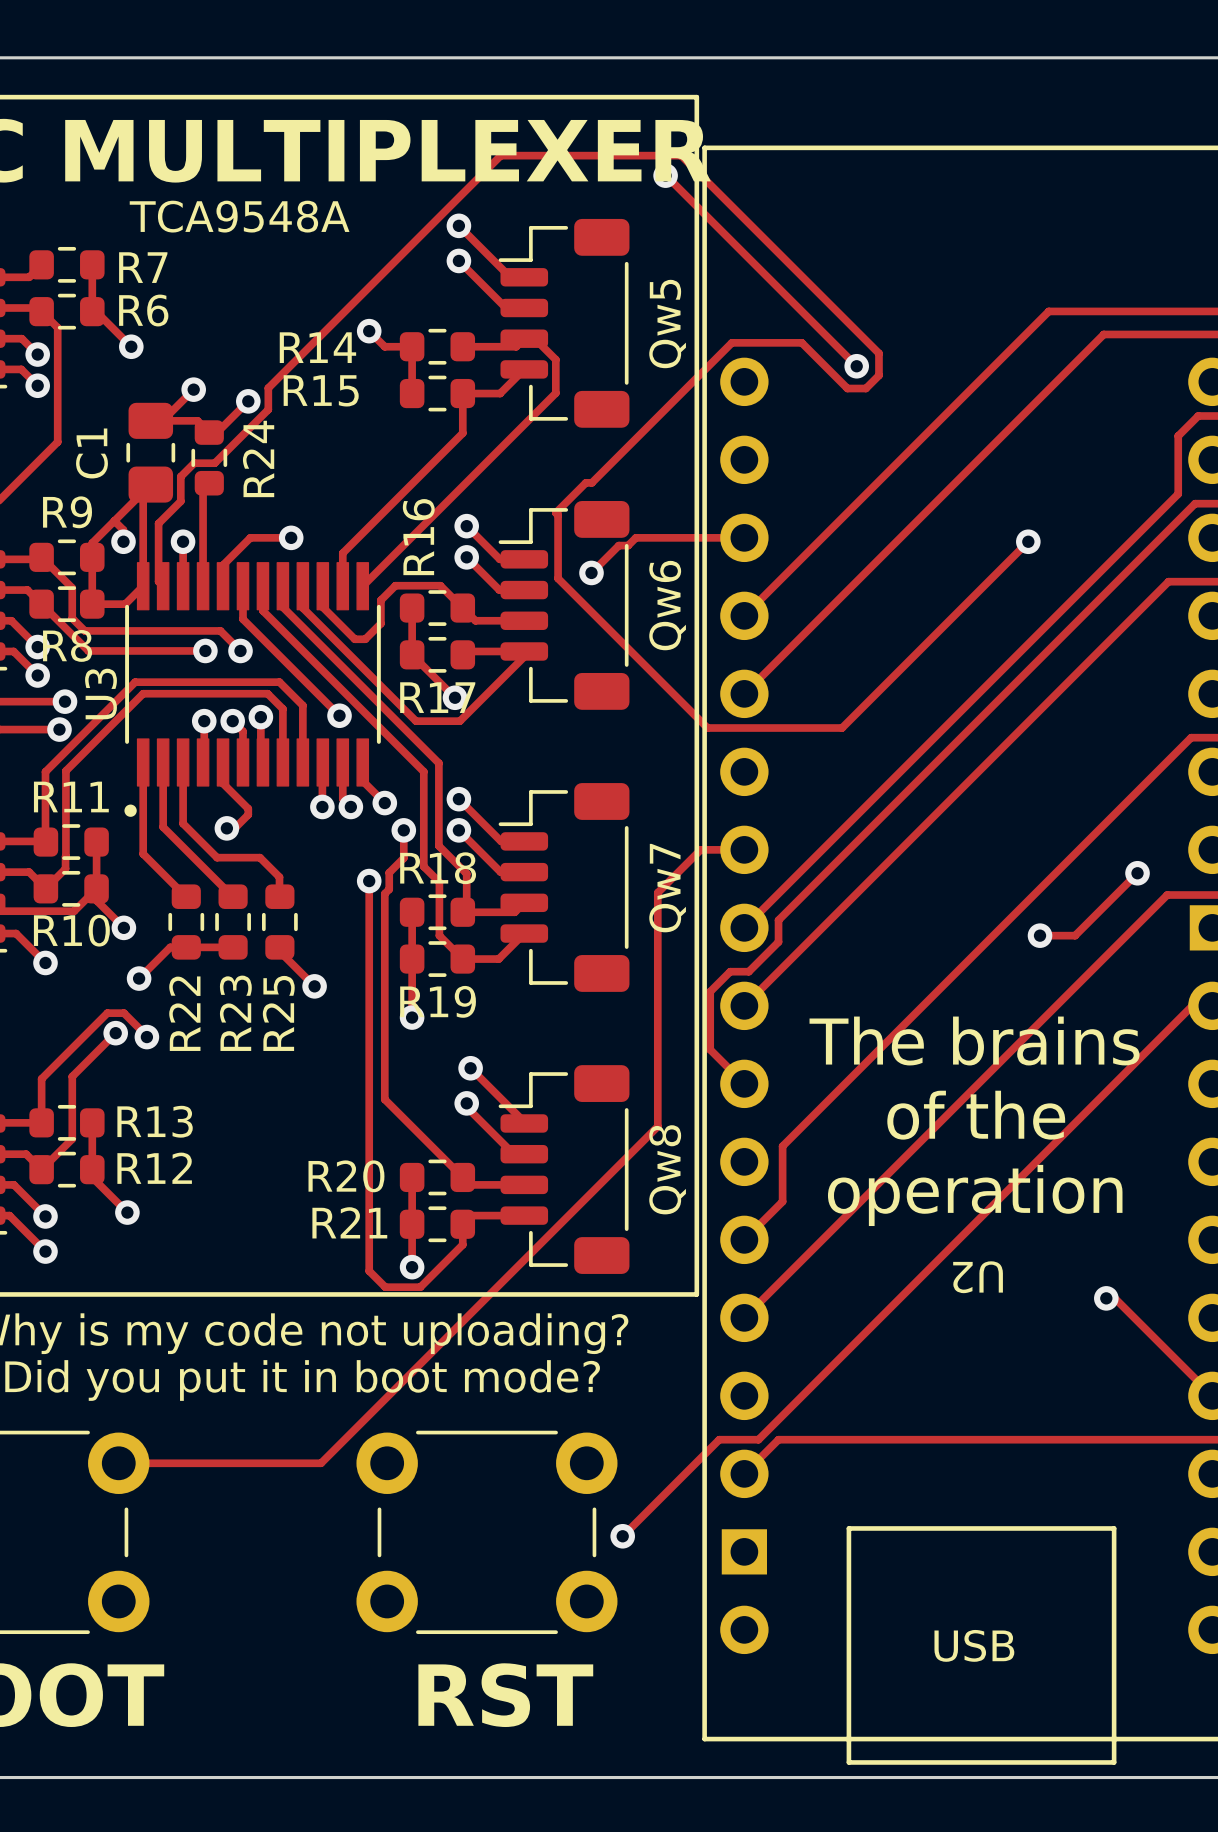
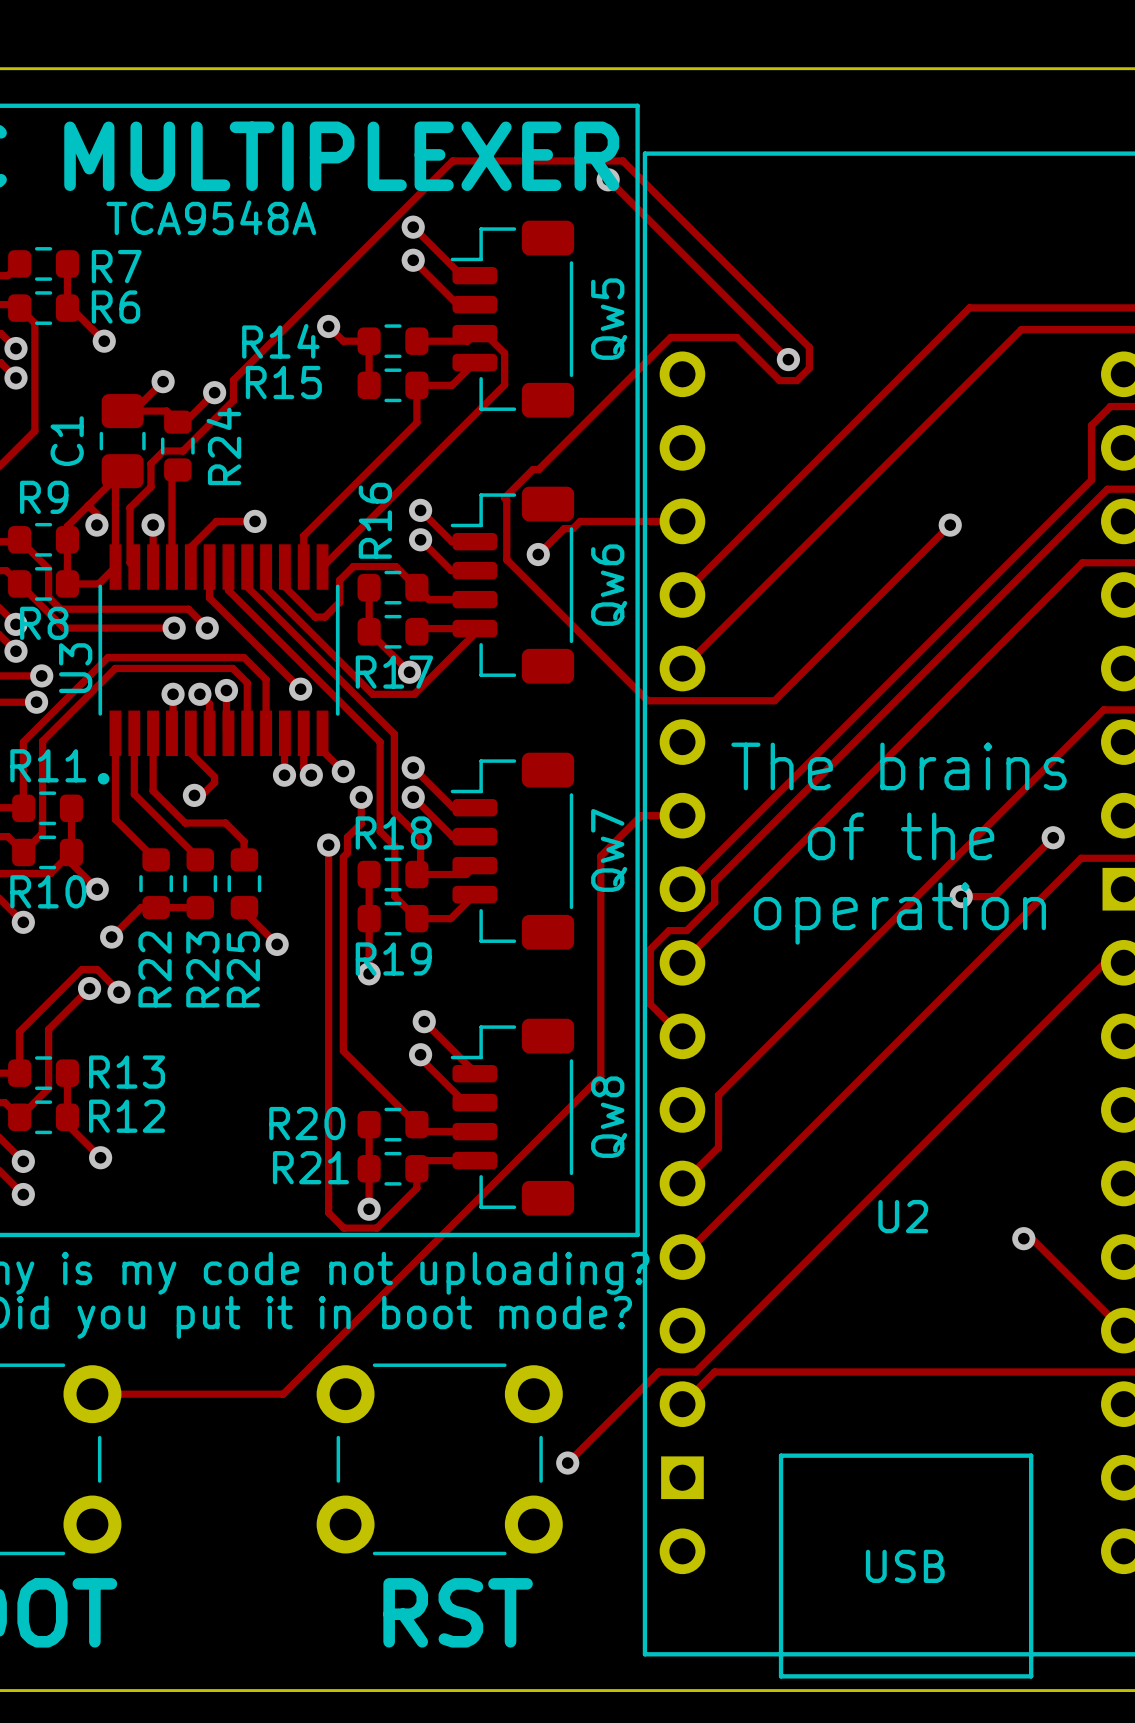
text position: The brains (974, 1041) -> The brains (899, 766)
text position: of the (976, 1115) -> of the (901, 836)
text position: operation (975, 1195) -> operation (900, 913)
U2 name rotation: 0° (978, 1277) -> 180° (903, 1216)

